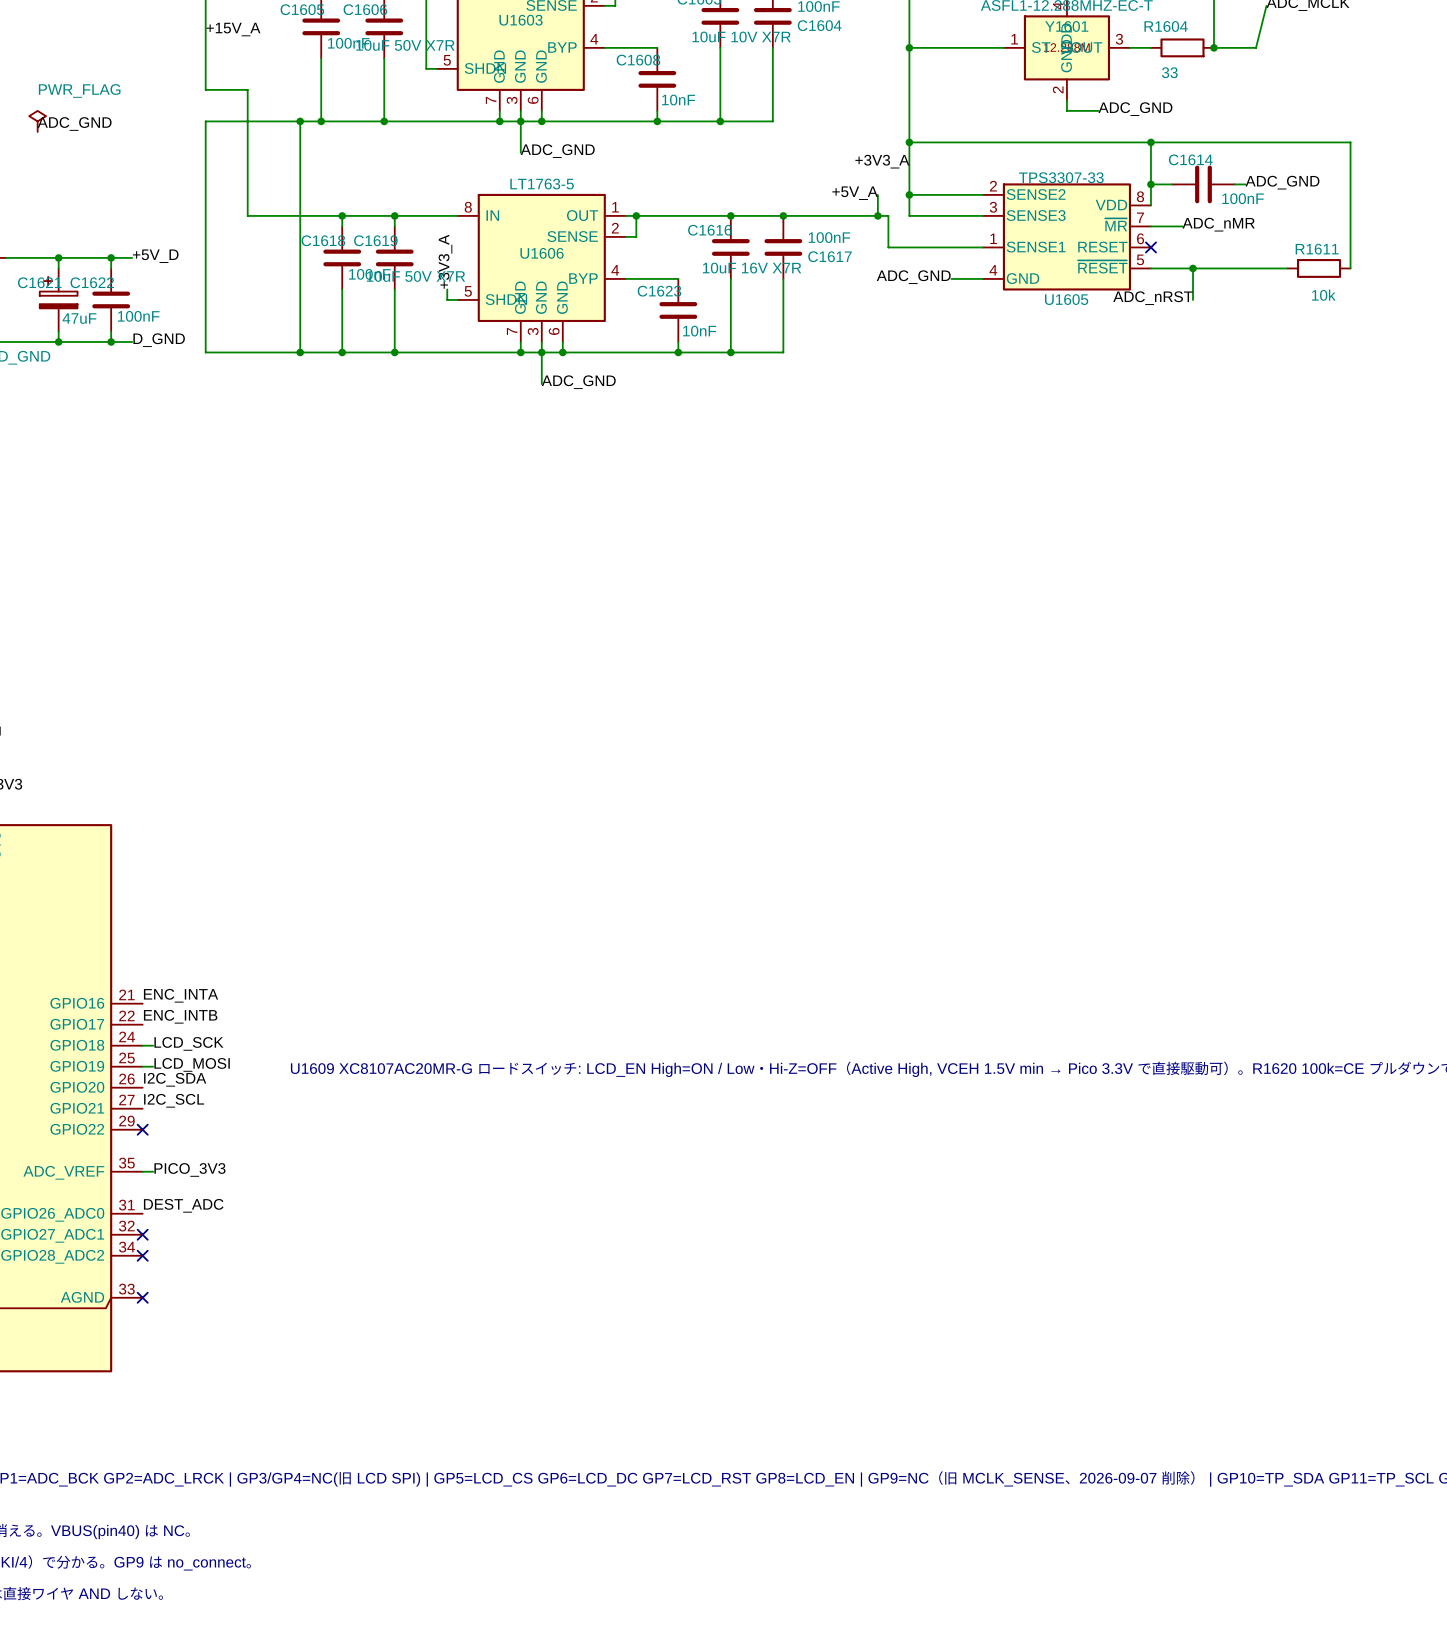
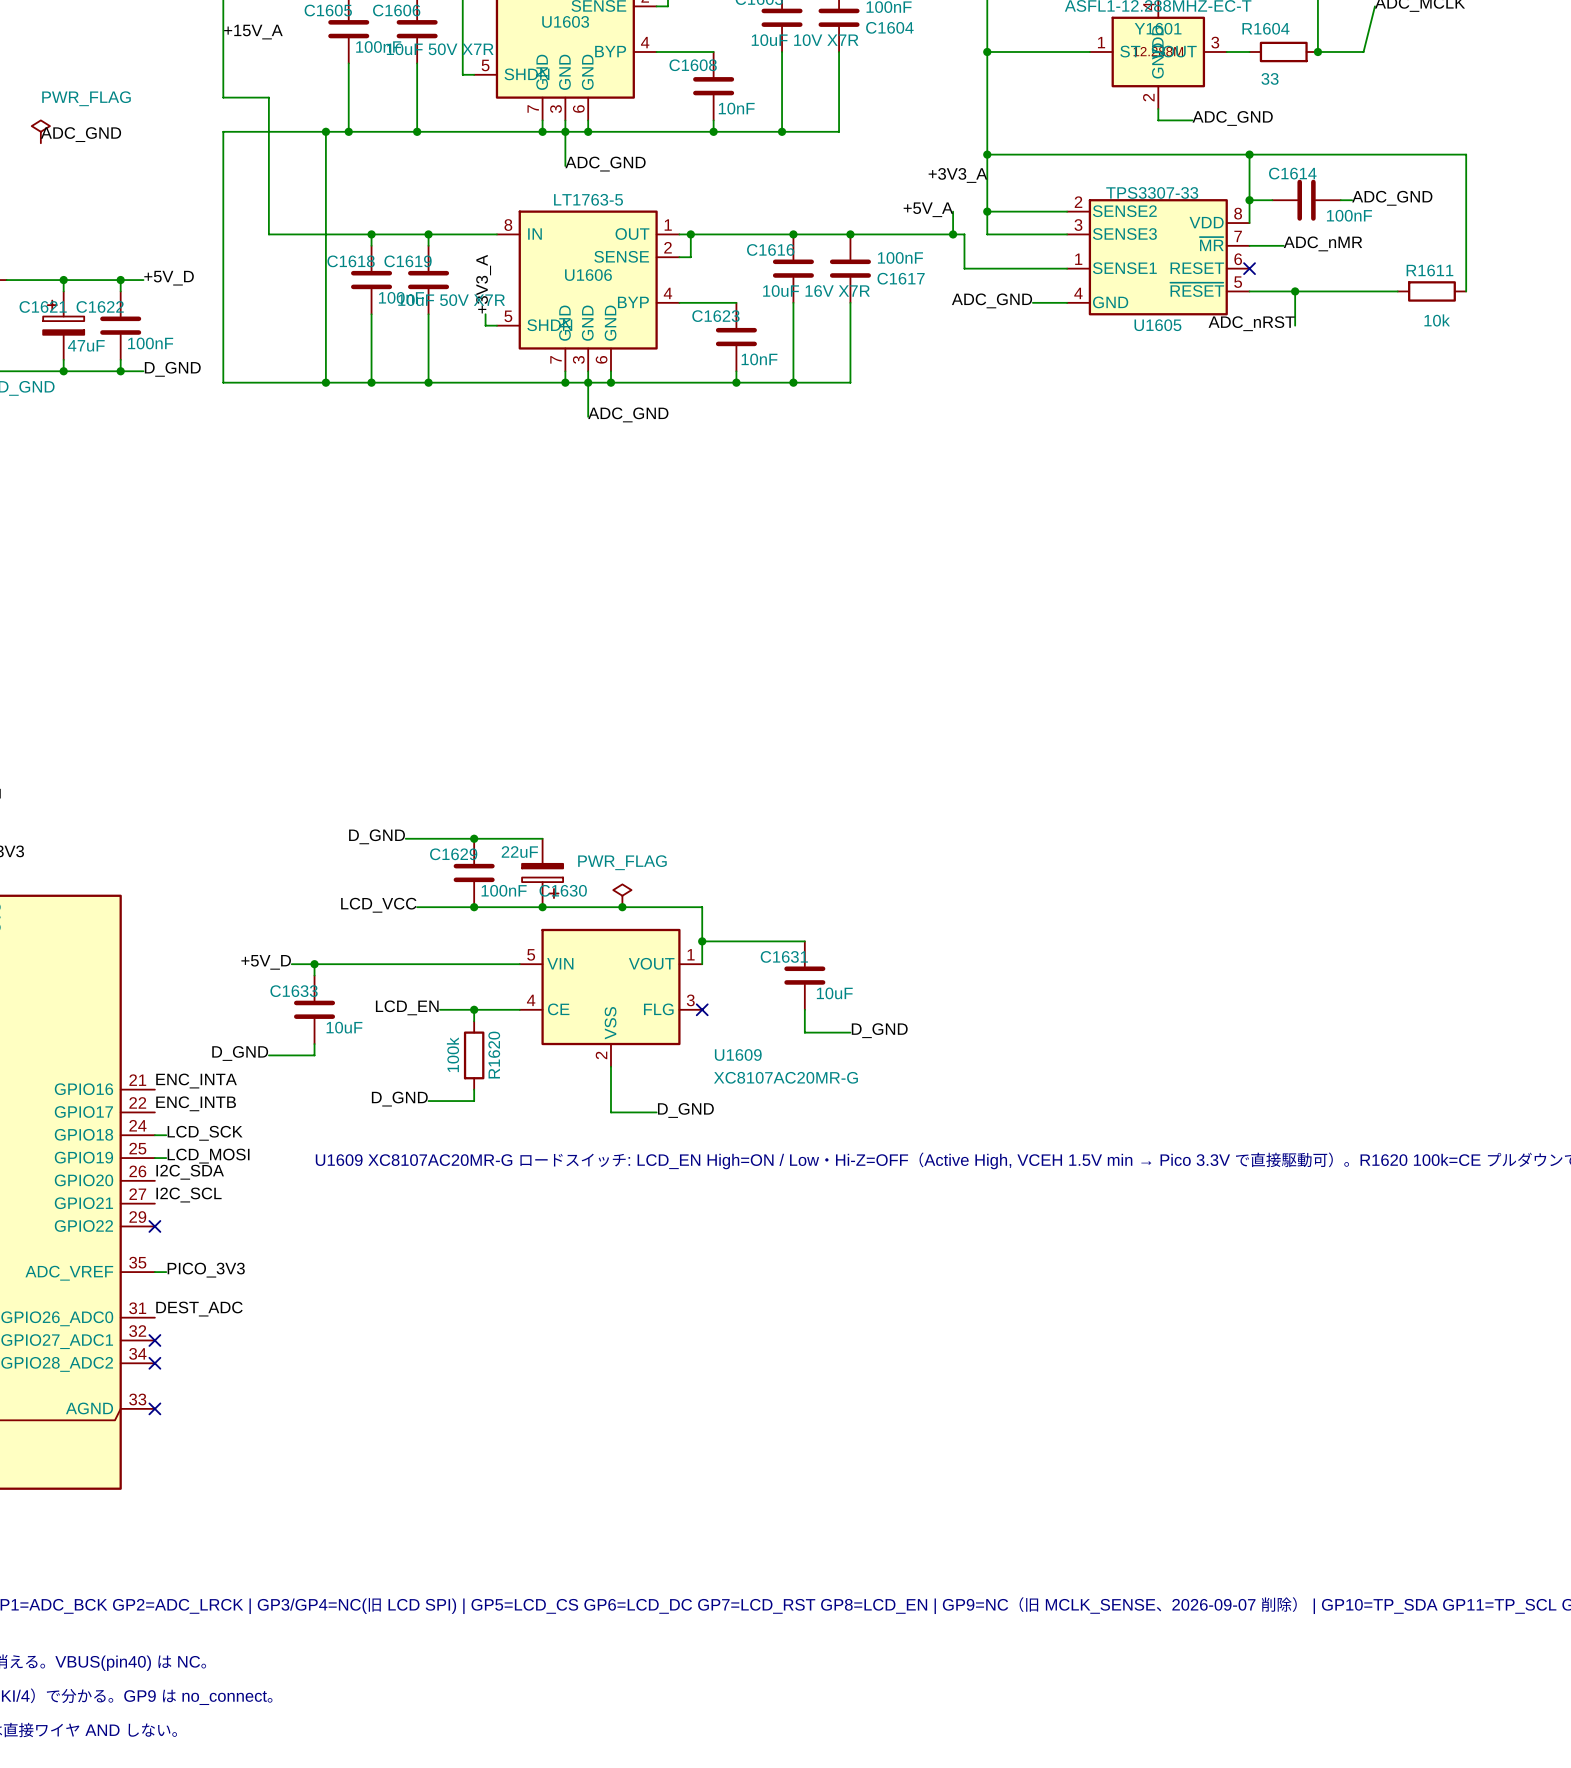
label: none -> D_GND (377, 836)
wire: none -> (405, 838) (542, 838)
junction: none -> (474, 838)
C1629: none -> 100nF (474, 872)
C1630: none -> 22uF (542, 872)
power symbol: none -> PWR_FLAG (622, 895)
label: none -> LCD_VCC (378, 905)
wire: none -> (417, 907) (702, 907) (702, 964)
junction: none -> (474, 907)
junction: none -> (542, 907)
junction: none -> (622, 907)
wire: none -> (702, 941) (804, 941)
junction: none -> (702, 941)
label: none -> +5V_D (266, 962)
wire: none -> (291, 964) (519, 964)
wire: none -> (314, 964) (314, 975)
junction: none -> (314, 964)
C1631: none -> 10uF (804, 975)
U1609: none -> XC8107AC20MR-G (610, 997)
label: none -> LCD_EN (407, 1007)
C1633: none -> 10uF (314, 1009)
wire: none -> (439, 1009) (519, 1009)
wire: none -> (474, 1009) (474, 1021)
junction: none -> (474, 1009)
no-connect mark: none -> (702, 1009)
wire: none -> (804, 1009) (804, 1032) (850, 1032)
label: none -> D_GND (879, 1030)
wire: none -> (314, 1044) (314, 1055) (268, 1055)
label: none -> D_GND (240, 1053)
R1620: none -> 100k (474, 1055)
wire: none -> (610, 1066) (610, 1112) (656, 1112)
wire: none -> (474, 1089) (474, 1101) (428, 1101)
label: none -> D_GND (399, 1099)
label: none -> D_GND (685, 1110)

